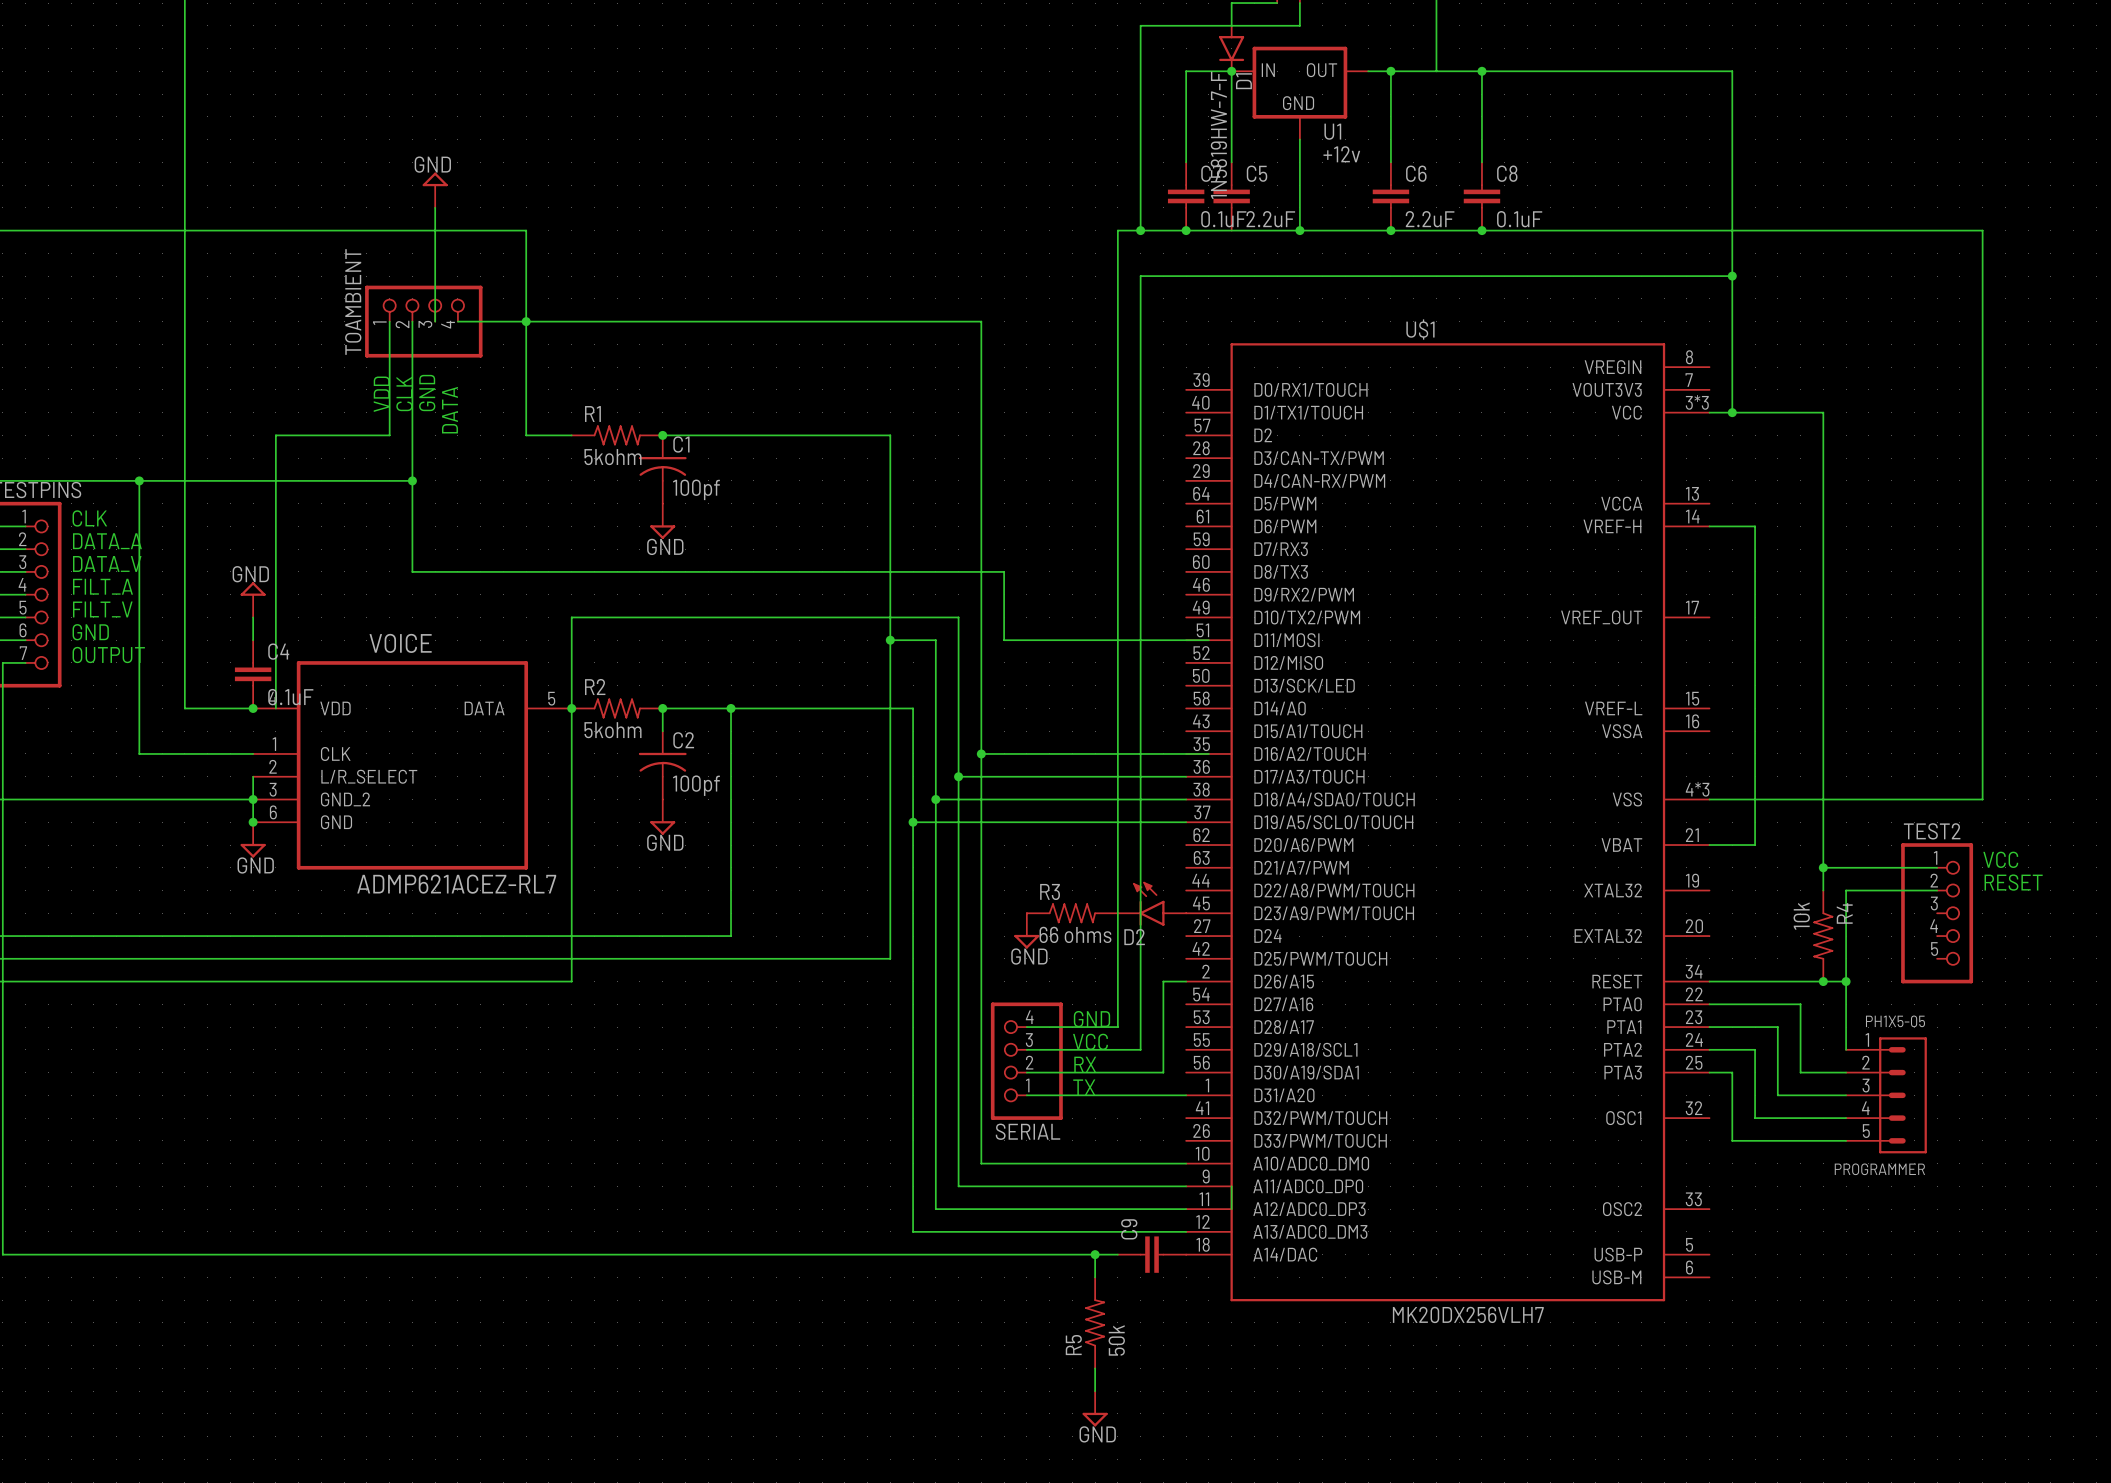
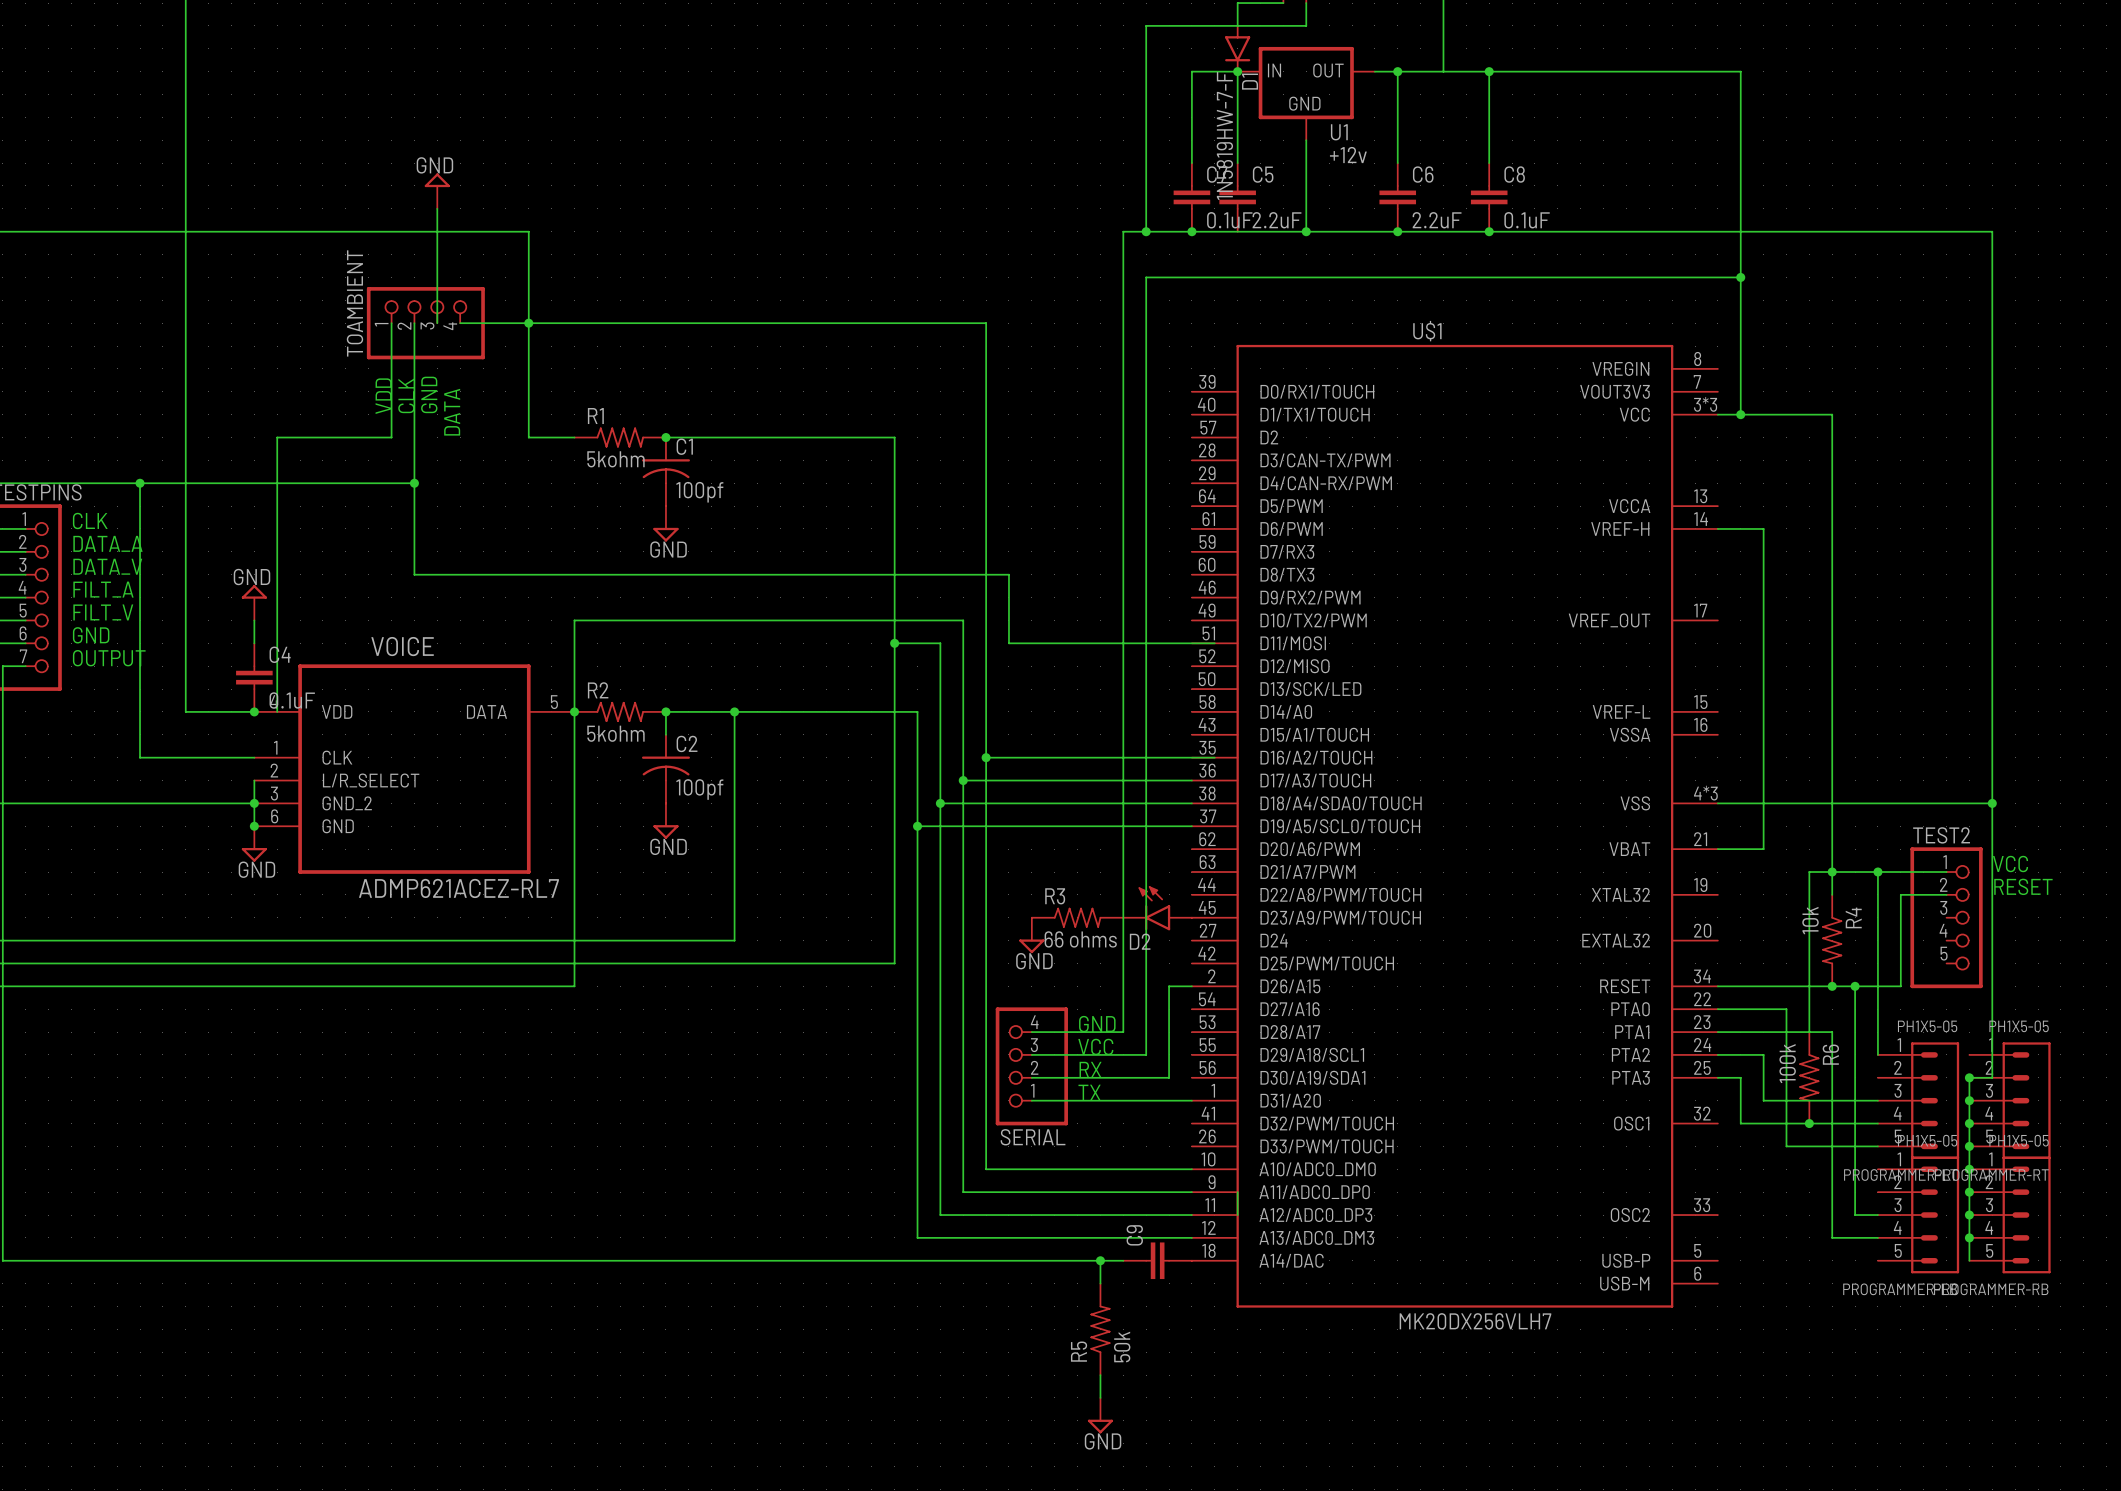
wire: none -> (1992, 803) (1992, 1077) (1969, 1077) (1969, 1260)
junction: none -> (1992, 803)
wire: none -> (1877, 872) (1877, 1054)
junction: none -> (1877, 872)
wire: (1891, 890) (1846, 890) (1846, 981) -> (1900, 894) (1900, 986) (1855, 986)
wire: (1777, 1004) (1800, 1004) -> (1832, 872) (1809, 872) (1809, 1009)
wire: none -> (1786, 1009) (1786, 1032) (1832, 1032) (1832, 1237) (1877, 1237)
wire: (1800, 1027) (1800, 1072) (1846, 1072) -> none
wire: none -> (1855, 1054) (1855, 1215) (1877, 1215)
R6: none -> 100k (1809, 1077)
junction: none -> (1969, 1077)
wire: (1755, 1095) (1755, 1118) -> (1763, 1100) (1786, 1100) (1786, 1146)
PROGRAMMER: PH1X5-05 (1886, 1095) -> none
PROGRAMMER-LT: none -> PH1X5-05 (1918, 1100)
junction: none -> (1969, 1100)
PROGRAMMER-RT: none -> PH1X5-05 (2010, 1100)
wire: (1732, 1118) (1732, 1140) (1777, 1140) -> (1740, 1123) (1763, 1123)
junction: none -> (1809, 1123)
junction: none -> (1969, 1123)
junction: none -> (1969, 1146)
junction: none -> (1969, 1169)
junction: none -> (1969, 1192)
PROGRAMMER-LB: none -> PH1X5-05 (1918, 1215)
junction: none -> (1969, 1215)
PROGRAMMER-RB: none -> PH1X5-05 (2010, 1215)
junction: none -> (1969, 1237)

